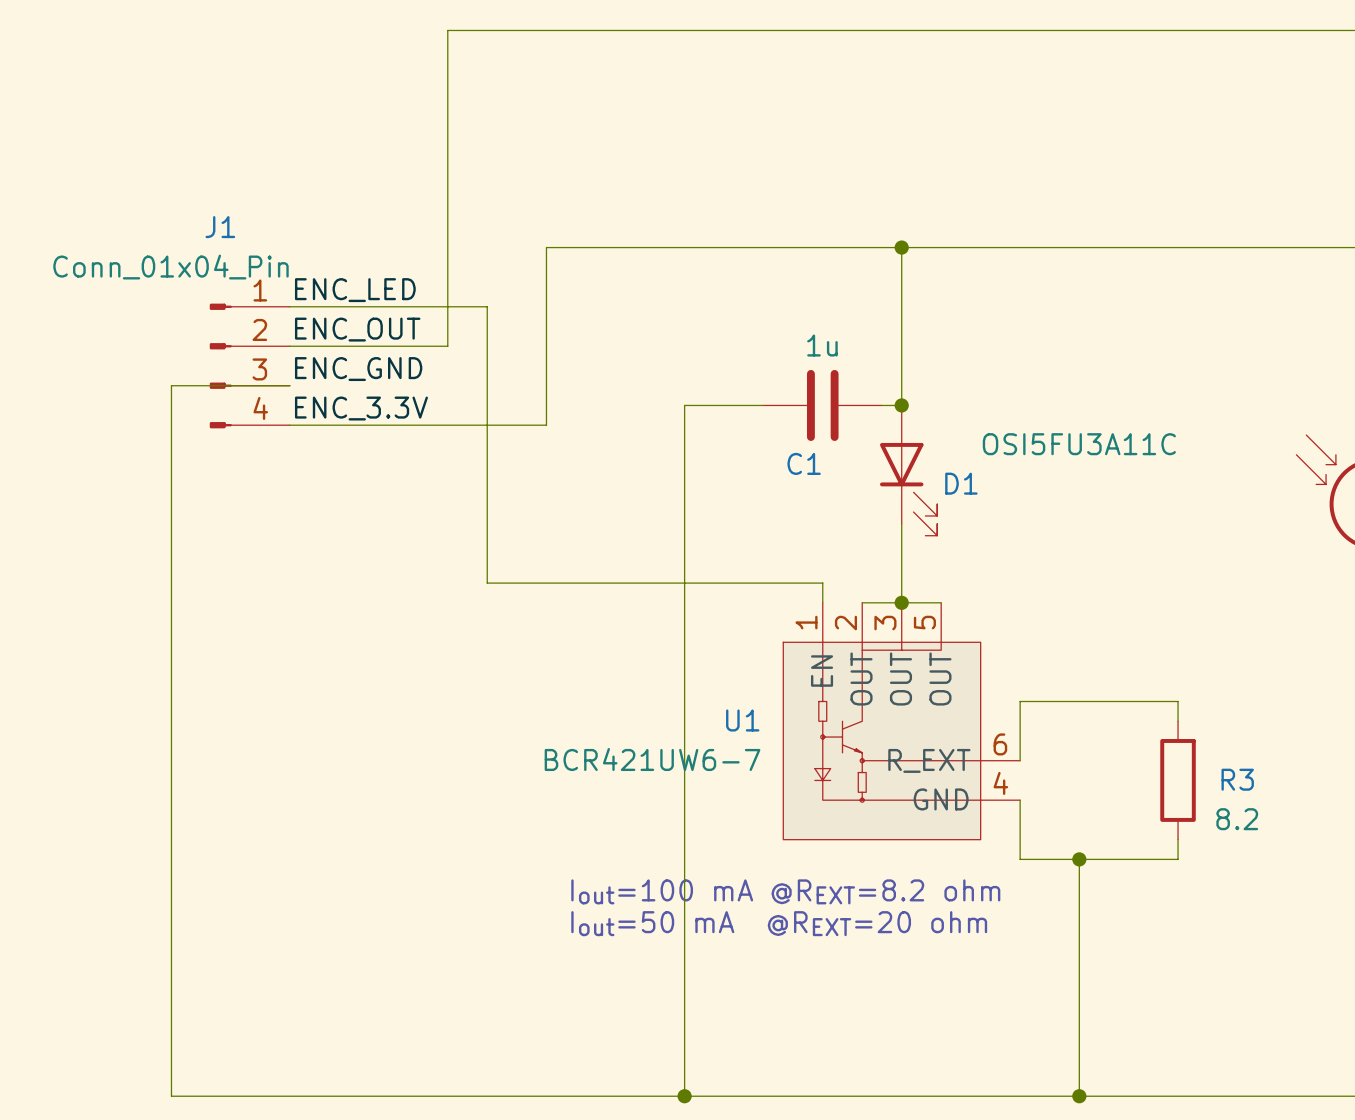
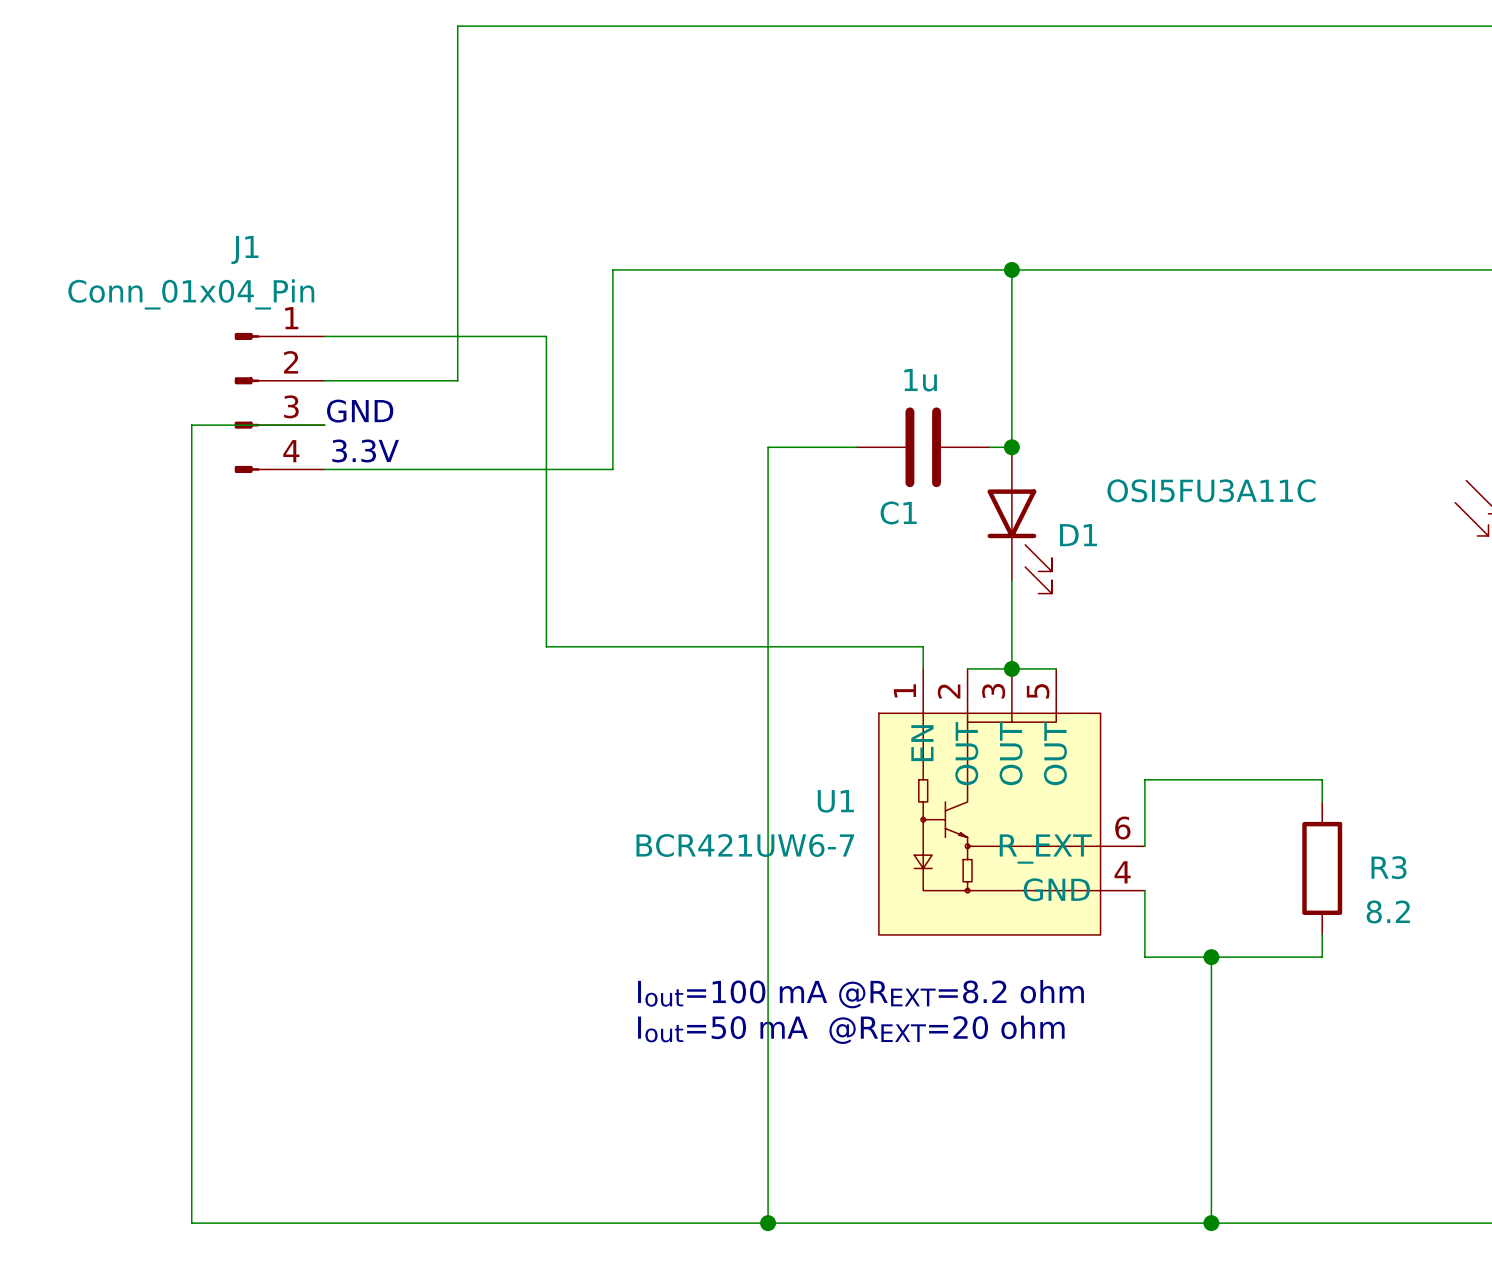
wire: (447, 30) (447, 346) (408, 346) -> (502, 26) (457, 26) (457, 380)
label: ENC_LED (355, 290) -> none
label: ENC_OUT (357, 329) -> none
label: ENC_GND (358, 369) -> none
text: none -> GND (360, 411)
text: none -> 3.3V (365, 450)
label: ENC_3.3V (361, 408) -> none

